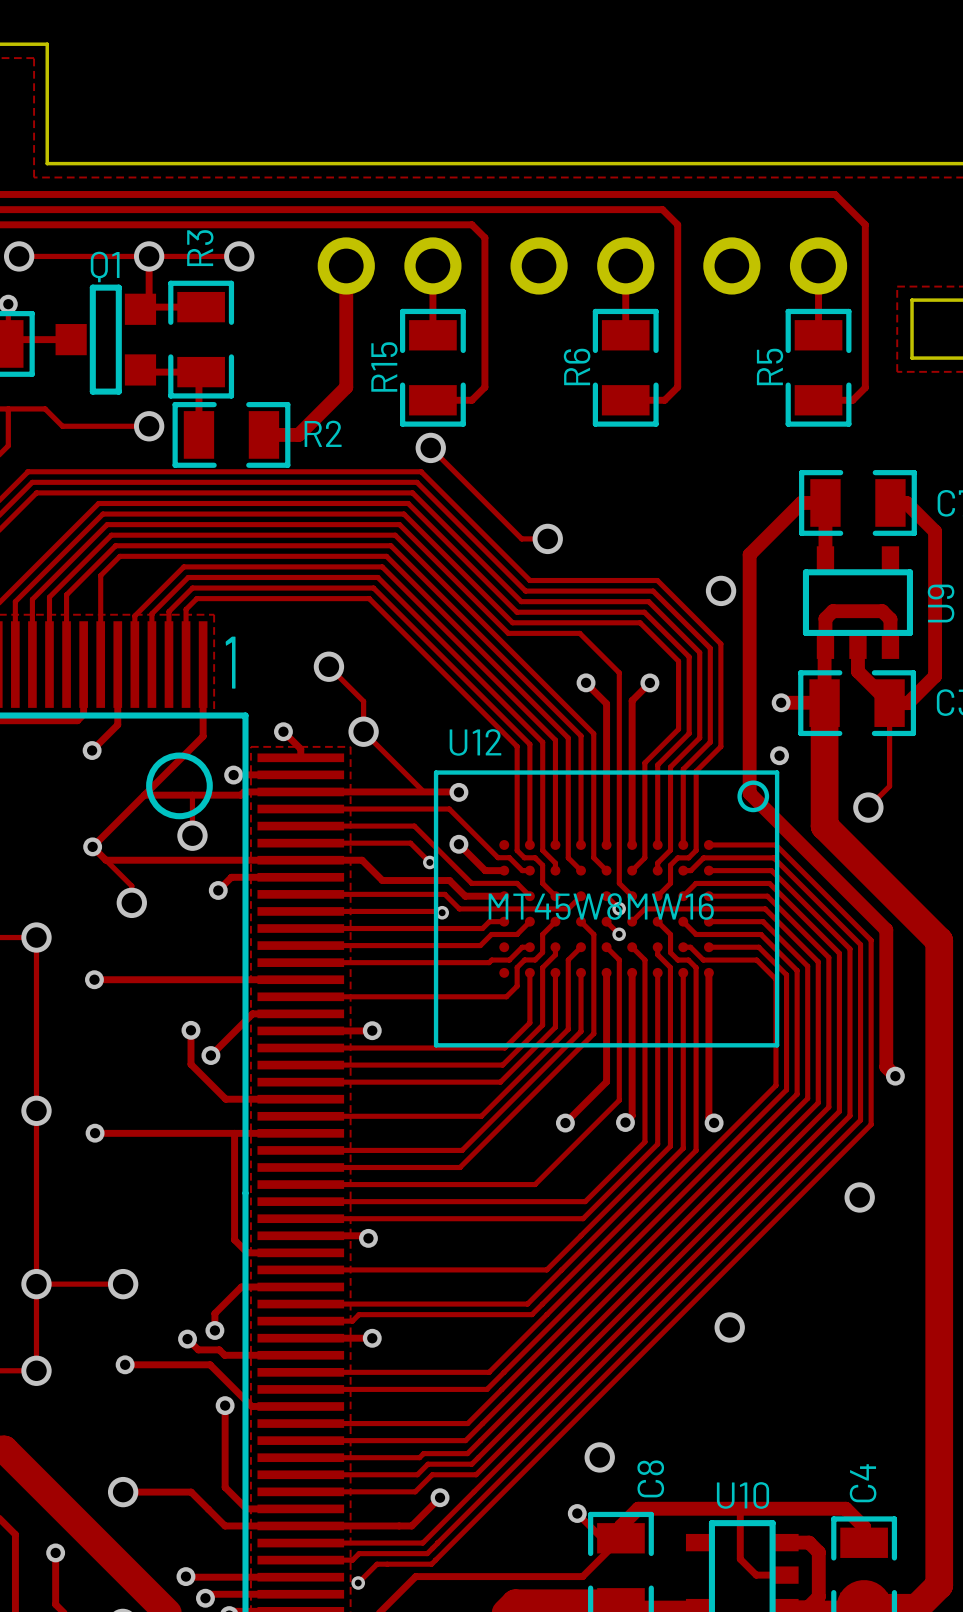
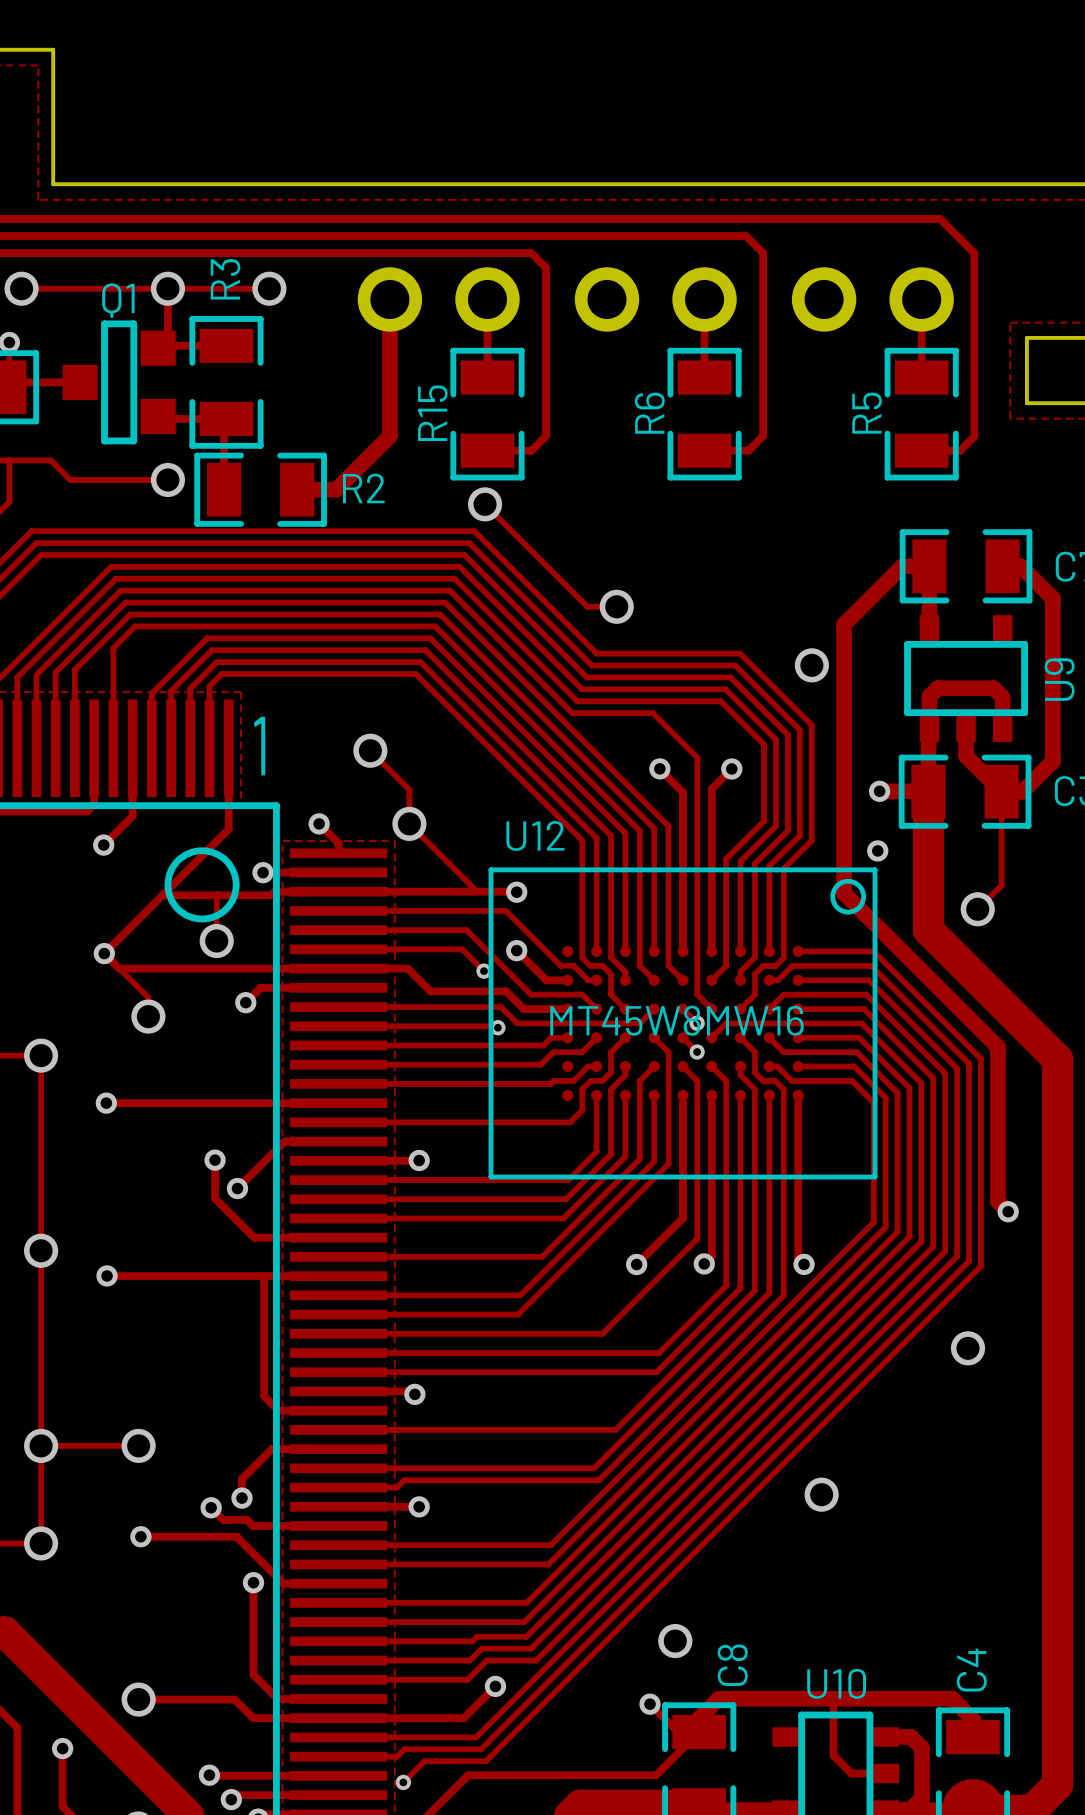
track: (123, 1492) (191, 1492) (208, 1509) -> (138, 1699) (234, 1699)
via position: (123, 1492) -> (138, 1699)

